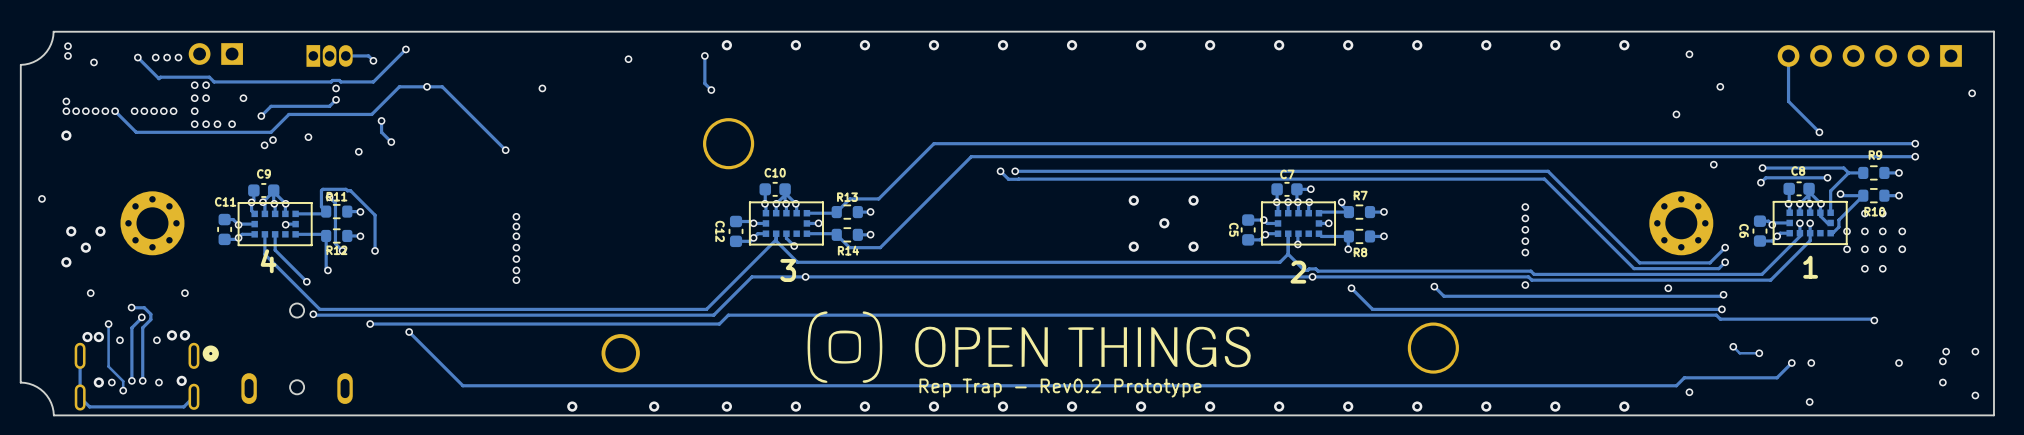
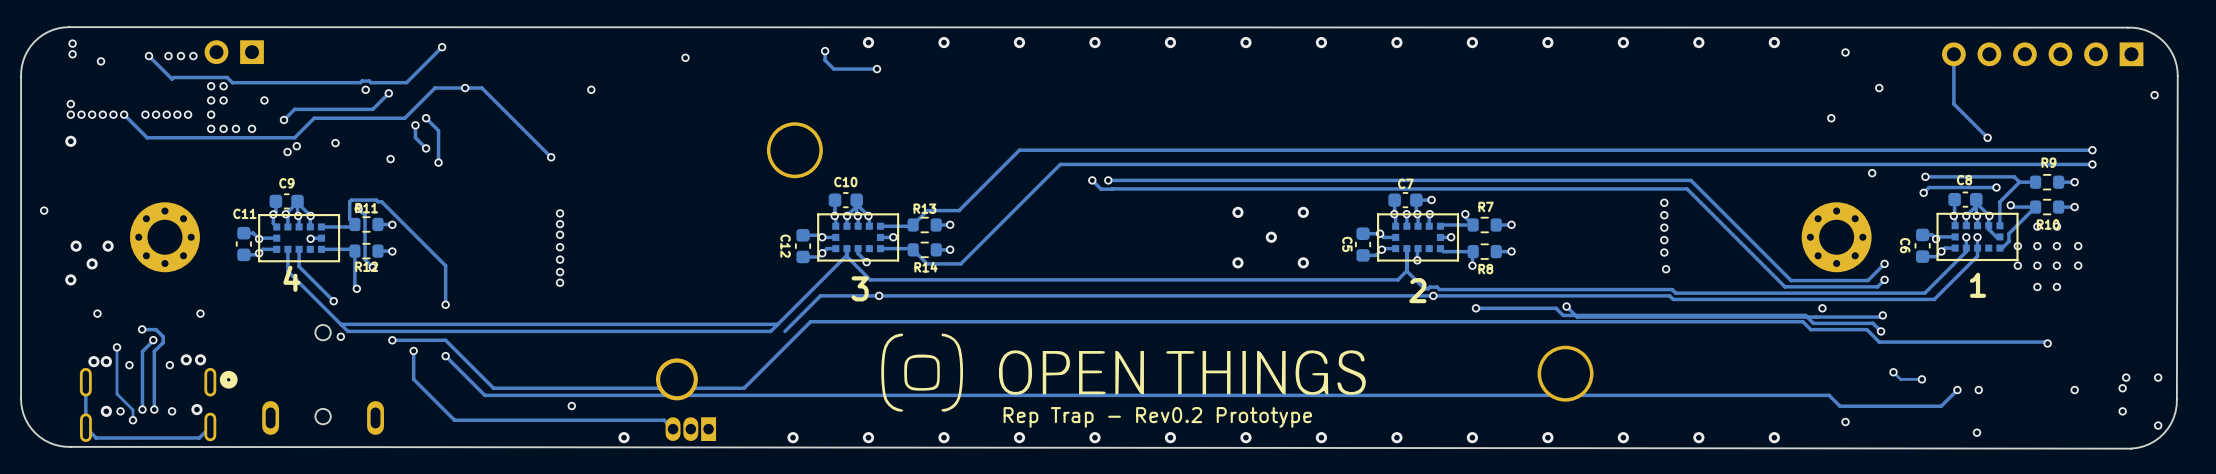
board edge: (1993, 31) (53, 31) (51, 44) (43, 54) (33, 62) (20, 64) (20, 382) (33, 385) (43, 392) (51, 402) (53, 415) (1993, 415) (1993, 31) -> (2131, 448) (59, 446) (44, 440) (31, 429) (23, 415) (21, 404) (21, 65) (27, 50) (38, 38) (52, 29) (69, 27) (2138, 28) (2154, 34) (2166, 45) (2172, 54) (2177, 70) (2176, 398) (2174, 417) (2164, 433) (2149, 444) (2131, 448)
via: (726, 45) -> none
track: none -> (825, 51) (825, 60) (833, 69) (876, 69)
via: none -> (825, 51)
part: (329, 55) -> none
track: (345, 55) (368, 55) (373, 60) -> none
track: (704, 55) (704, 83) (711, 90) -> none
via: (704, 55) -> none
via: (373, 60) -> none
via: none -> (876, 69)
via: (711, 90) -> none
via: none -> (388, 93)
track: (336, 99) (329, 106) -> (388, 93) (372, 109) (358, 109)
via: (336, 99) -> none
track: none -> (426, 118) (438, 130) (438, 162)
via: none -> (426, 118)
via: none -> (438, 162)
via: none -> (1664, 202)
via: none -> (560, 213)
via: none -> (1664, 215)
via: (1525, 207) -> none
via: none -> (560, 224)
via: none -> (1664, 227)
track: (375, 215) (375, 250) -> (408, 228) (445, 265) (445, 304)
via: (516, 216) -> none
via: (1525, 218) -> none
via: none -> (560, 234)
via: none -> (1664, 240)
via: (516, 226) -> none
via: (1525, 229) -> none
via: none -> (560, 247)
via: (516, 236) -> none
via: none -> (1664, 252)
via: (1525, 241) -> none
via: none -> (560, 259)
via: (516, 247) -> none
via: (375, 250) -> none
via: none -> (560, 272)
via: (516, 259) -> none
via: none -> (560, 282)
via: (516, 270) -> none
via: (516, 280) -> none
via: none -> (445, 304)
via: (1525, 285) -> none
track: (1351, 288) (1372, 309) (1721, 309) -> (1476, 308) (1556, 308) (1563, 315) (1805, 315) (1813, 323) (1872, 323) (1881, 331)
track: none -> (777, 324) (340, 324)
track: (719, 309) (713, 315) (313, 314) -> none
track: (1716, 315) (728, 315) -> (1874, 337) (1866, 329) (1810, 329) (1802, 321) (810, 321) (794, 337)
via: none -> (392, 340)
via: (370, 324) -> none
track: (719, 324) (370, 324) -> (784, 347) (744, 388) (493, 388) (445, 340) (392, 340)
track: none -> (413, 350) (413, 379) (454, 420) (664, 420) (673, 429)
via: none -> (413, 350)
track: (445, 367) (462, 385) (1676, 385) (1684, 377) -> (484, 395) (1829, 395) (1839, 406)
via: none -> (571, 406)
part: none -> (690, 429)
via: (654, 406) -> none

